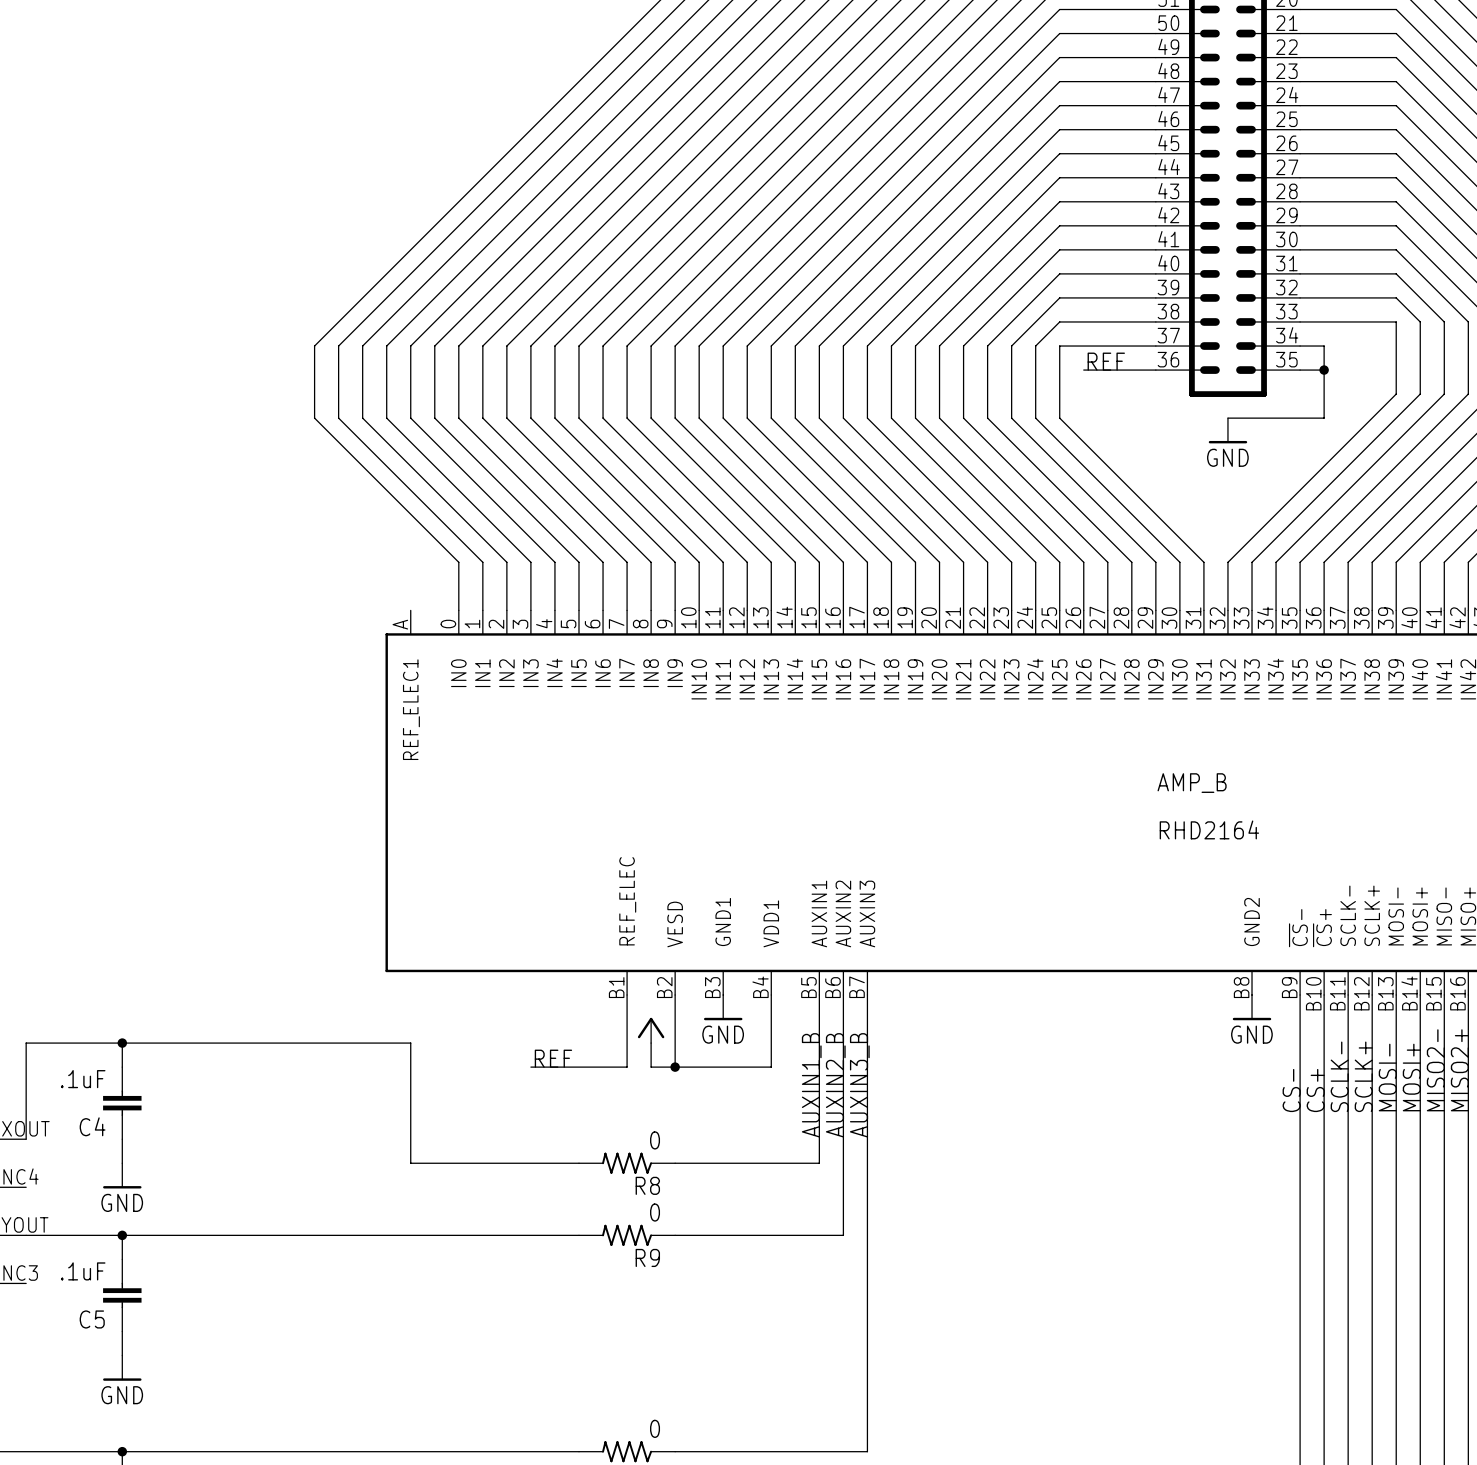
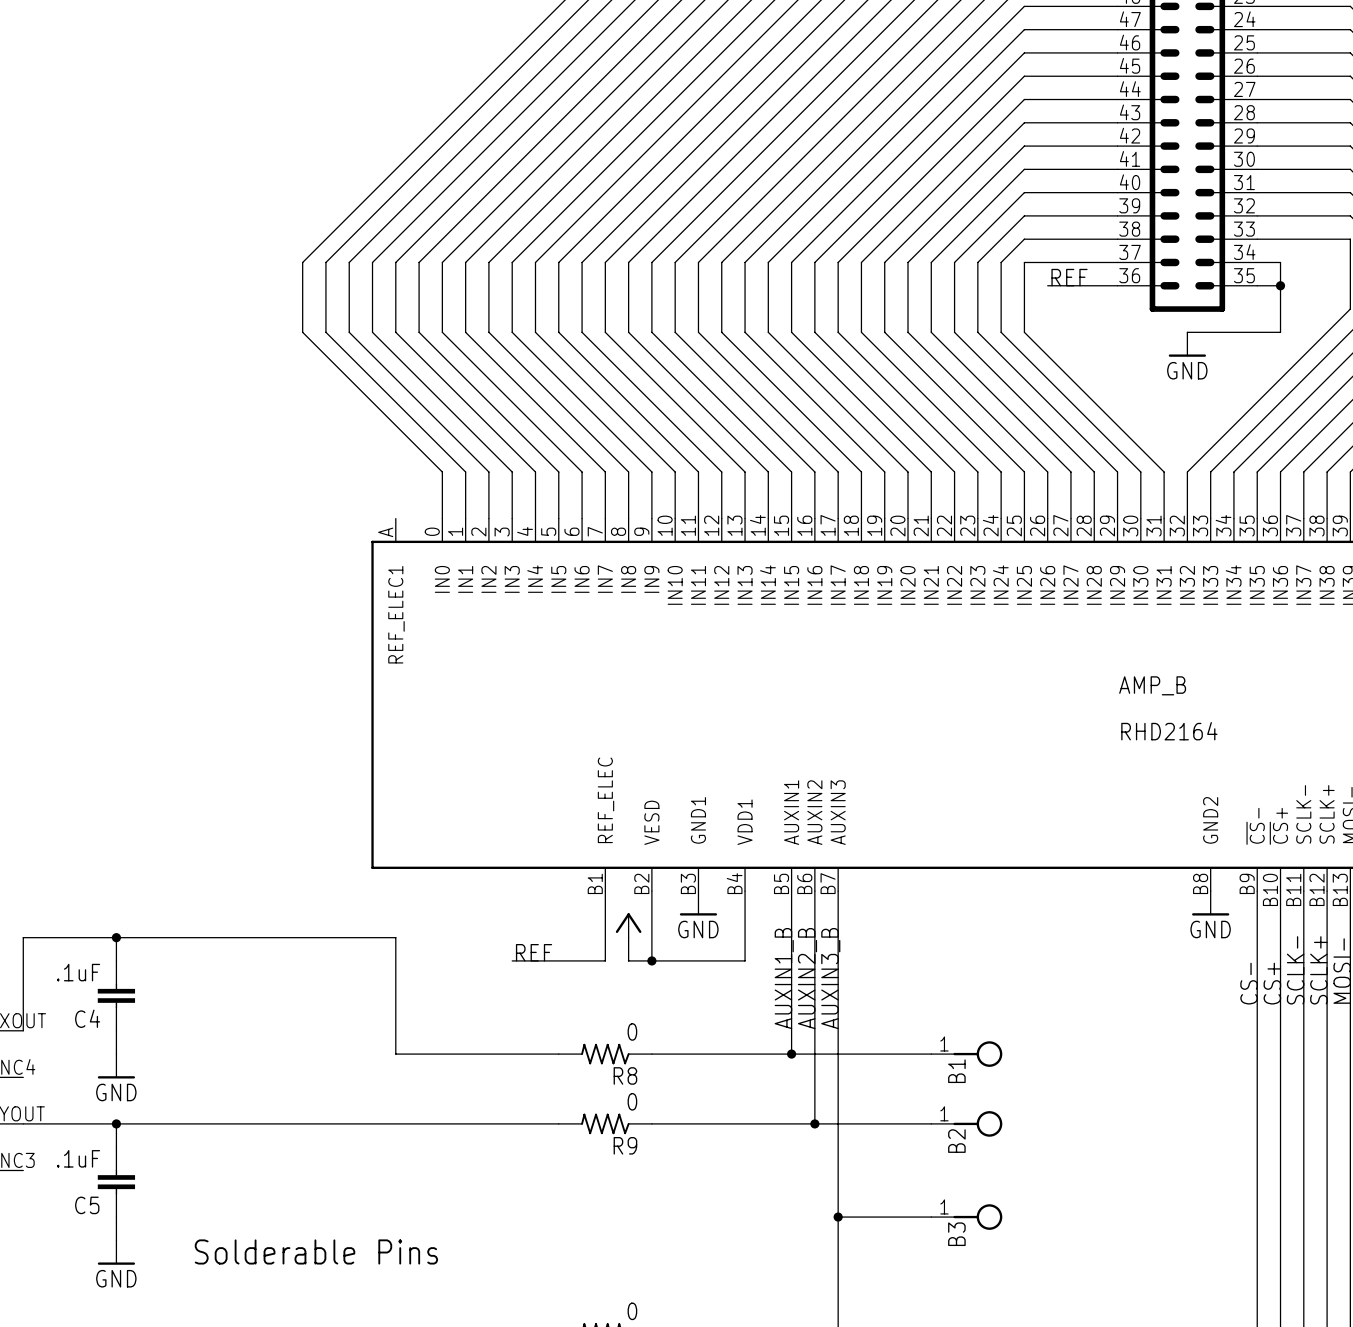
wire: none -> (791, 1054) (931, 1054)
junction: none -> (791, 1054)
B1: none -> (966, 1054)
wire: none -> (814, 1123) (931, 1123)
junction: none -> (814, 1123)
B2: none -> (966, 1123)
wire: none -> (838, 1217) (931, 1217)
junction: none -> (838, 1217)
B3: none -> (966, 1217)
text: none -> Solderable Pins (316, 1251)

